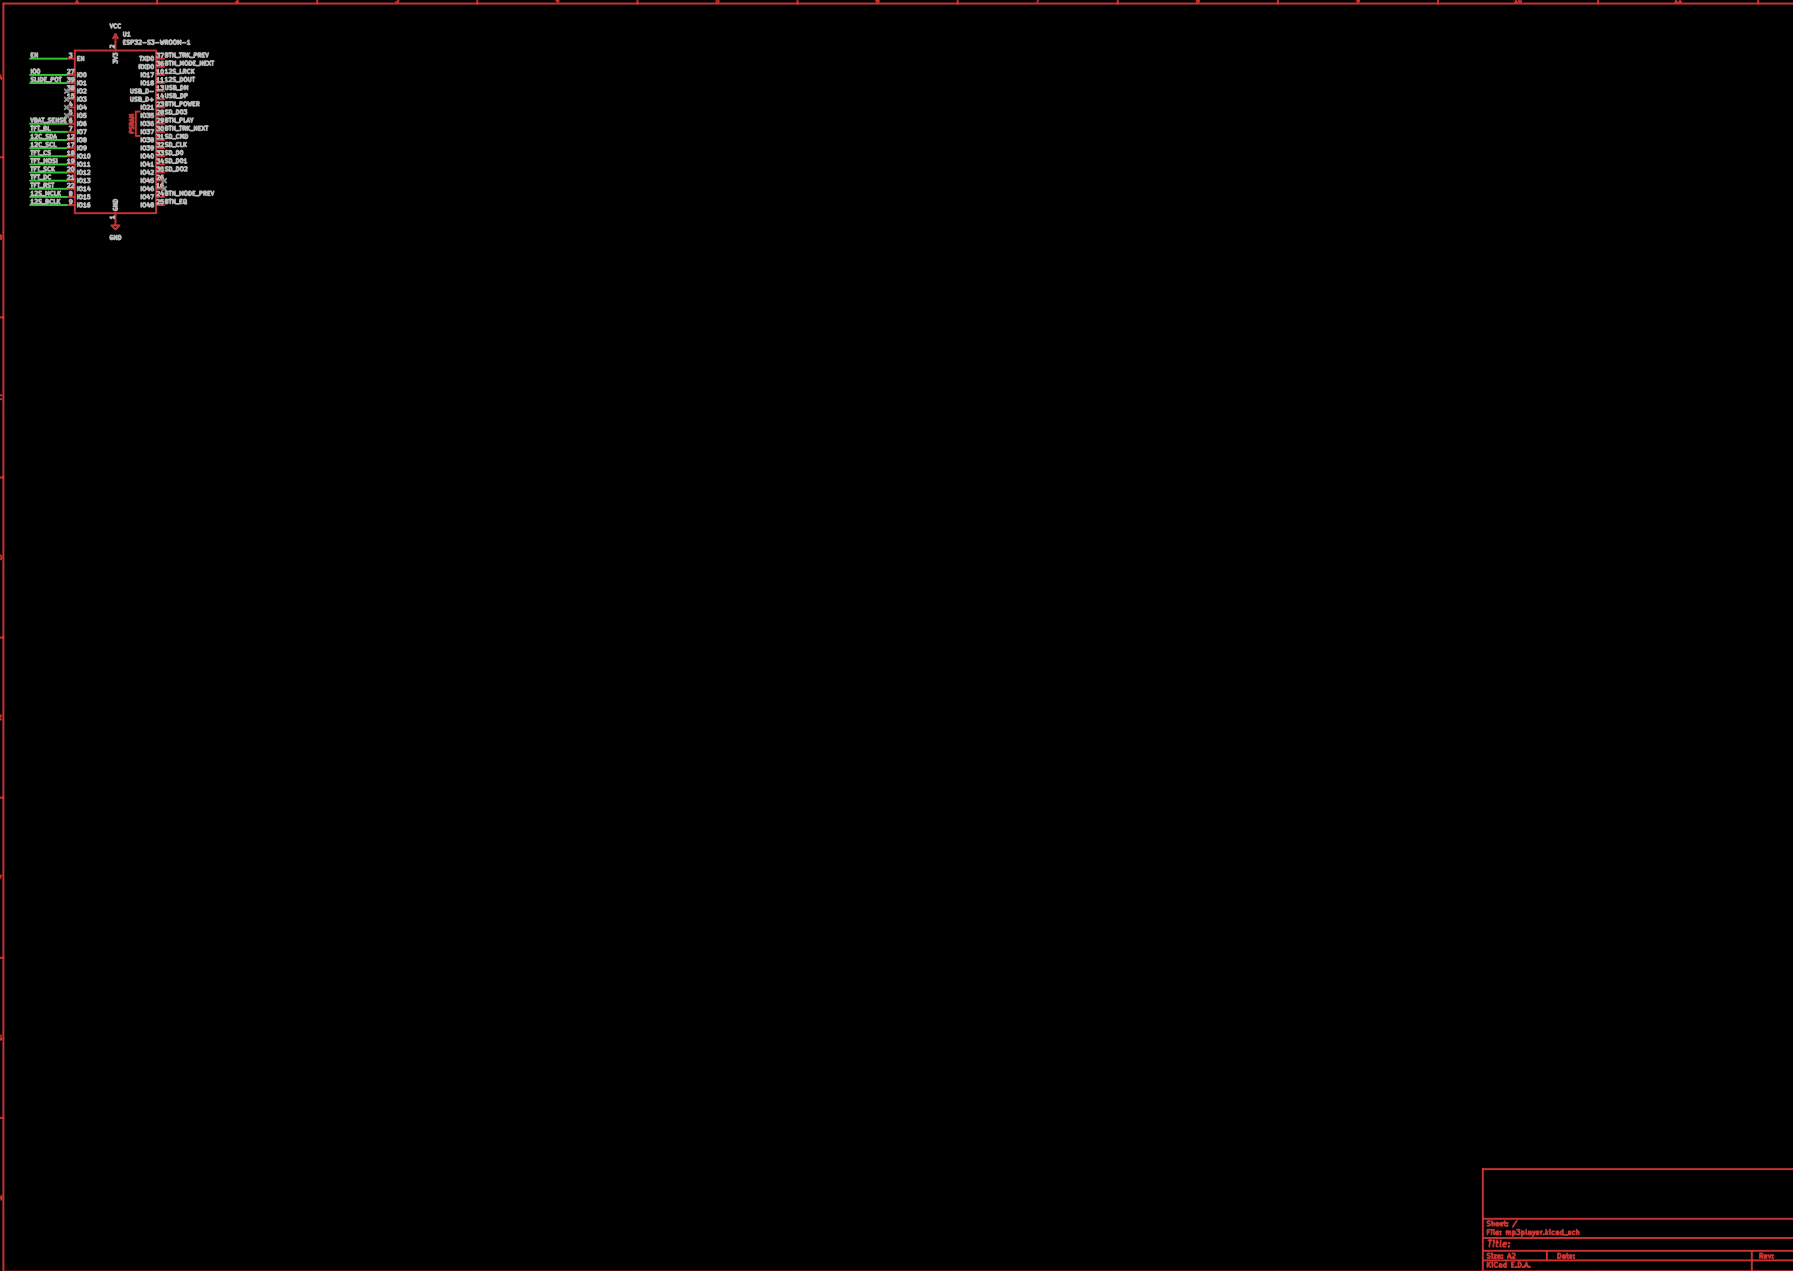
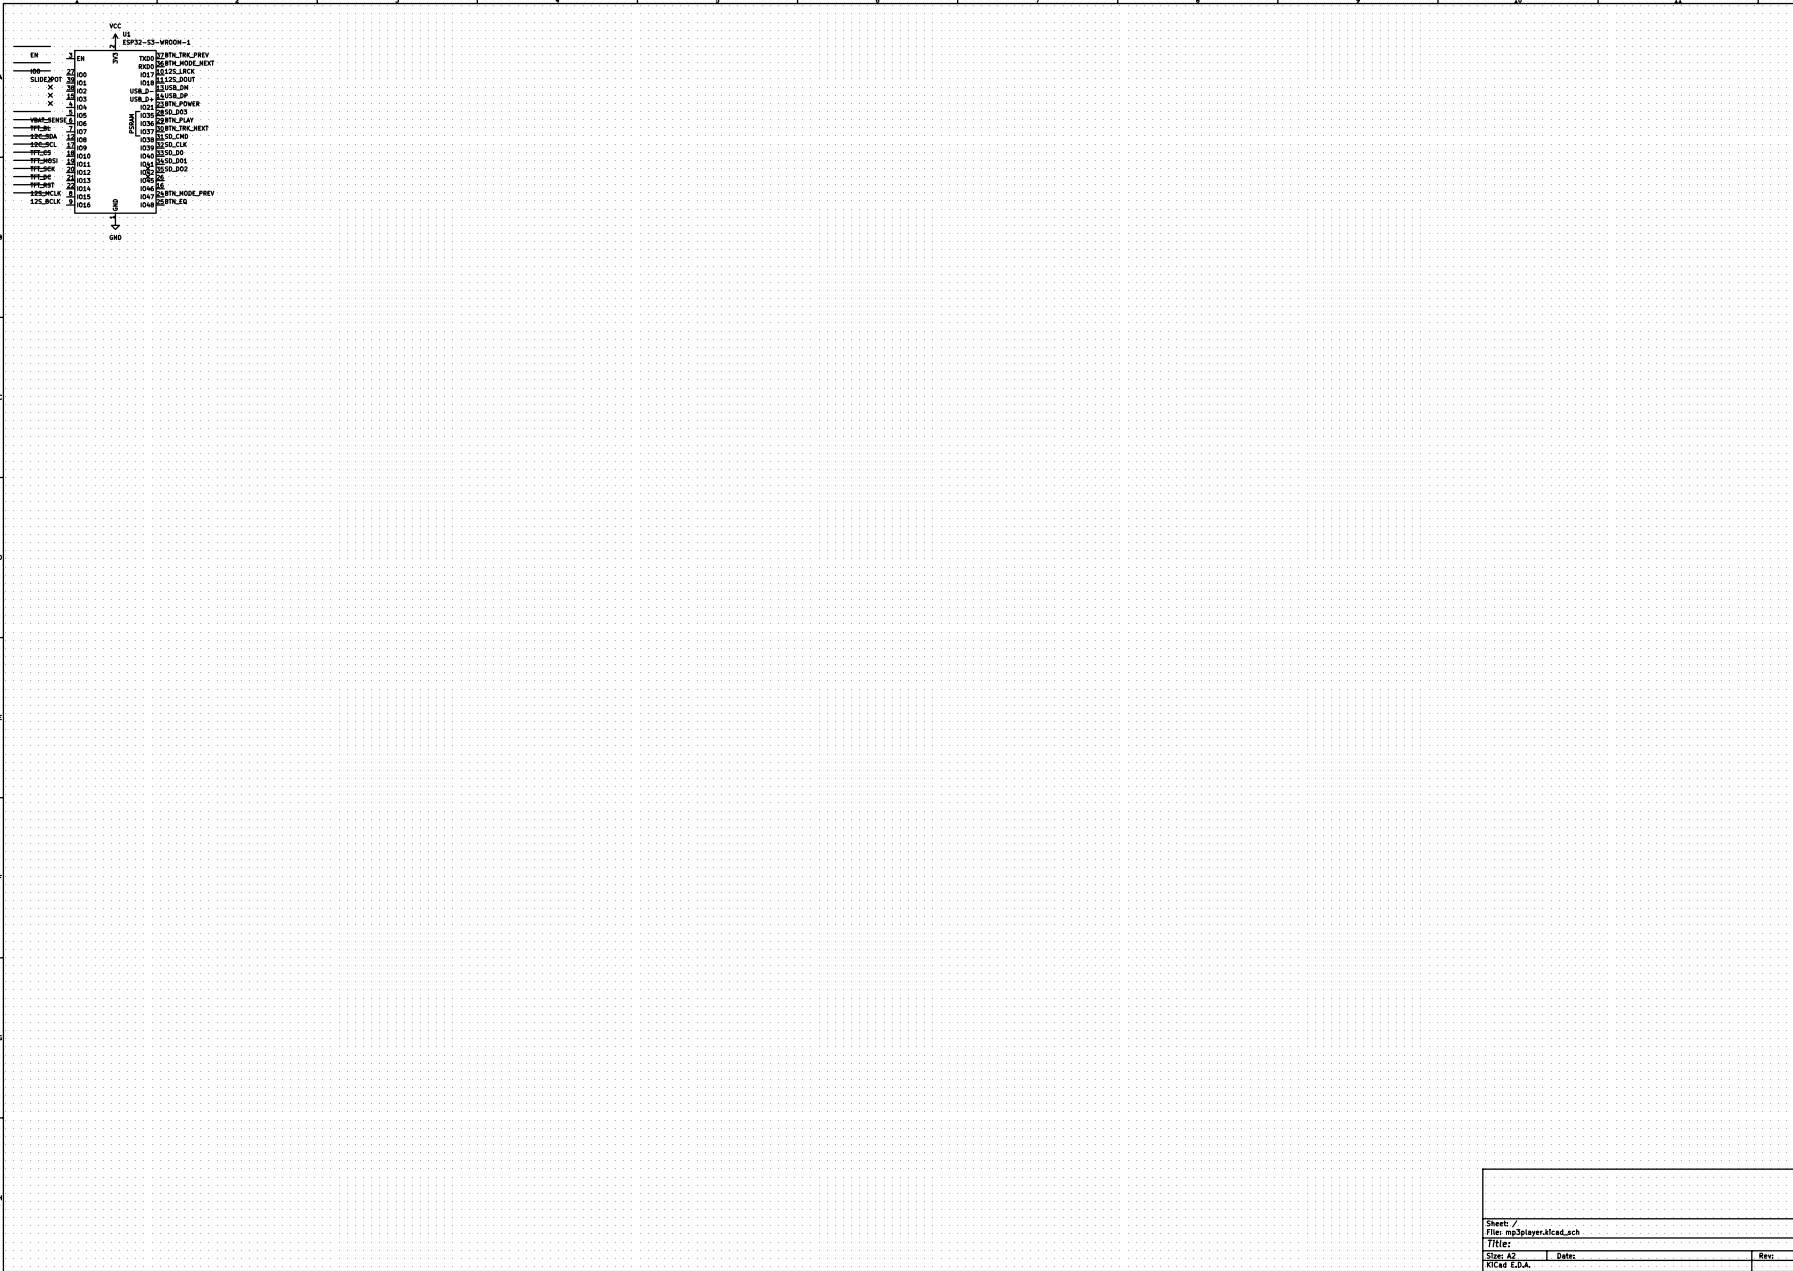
wire: (30, 58) (66, 58) -> (13, 46) (50, 46)
wire: (30, 74) (66, 74) -> (13, 62) (50, 62)
no-connect mark: none -> (50, 78)
wire: (30, 83) (66, 83) -> (13, 70) (50, 70)
no-connect mark: none -> (50, 87)
no-connect mark: (66, 91) -> none
no-connect mark: none -> (50, 95)
no-connect mark: (66, 99) -> none
no-connect mark: none -> (50, 103)
no-connect mark: (66, 107) -> none
no-connect mark: (66, 115) -> none
wire: (30, 123) (66, 123) -> (13, 111) (50, 111)
wire: (30, 131) (66, 131) -> (13, 119) (50, 119)
wire: (30, 139) (66, 139) -> (13, 127) (50, 127)
wire: (30, 148) (66, 148) -> (13, 135) (50, 135)
wire: (30, 156) (66, 156) -> (13, 144) (50, 144)
wire: (30, 164) (66, 164) -> (13, 152) (50, 152)
no-connect mark: none -> (147, 168)
wire: (30, 172) (66, 172) -> (13, 160) (50, 160)
no-connect mark: none -> (147, 176)
wire: (30, 180) (66, 180) -> (13, 168) (50, 168)
no-connect mark: (164, 180) -> none
wire: (30, 188) (66, 188) -> (13, 176) (50, 176)
no-connect mark: (164, 188) -> none
wire: (30, 196) (66, 196) -> (13, 184) (50, 184)
wire: (30, 205) (66, 205) -> (13, 192) (50, 192)

